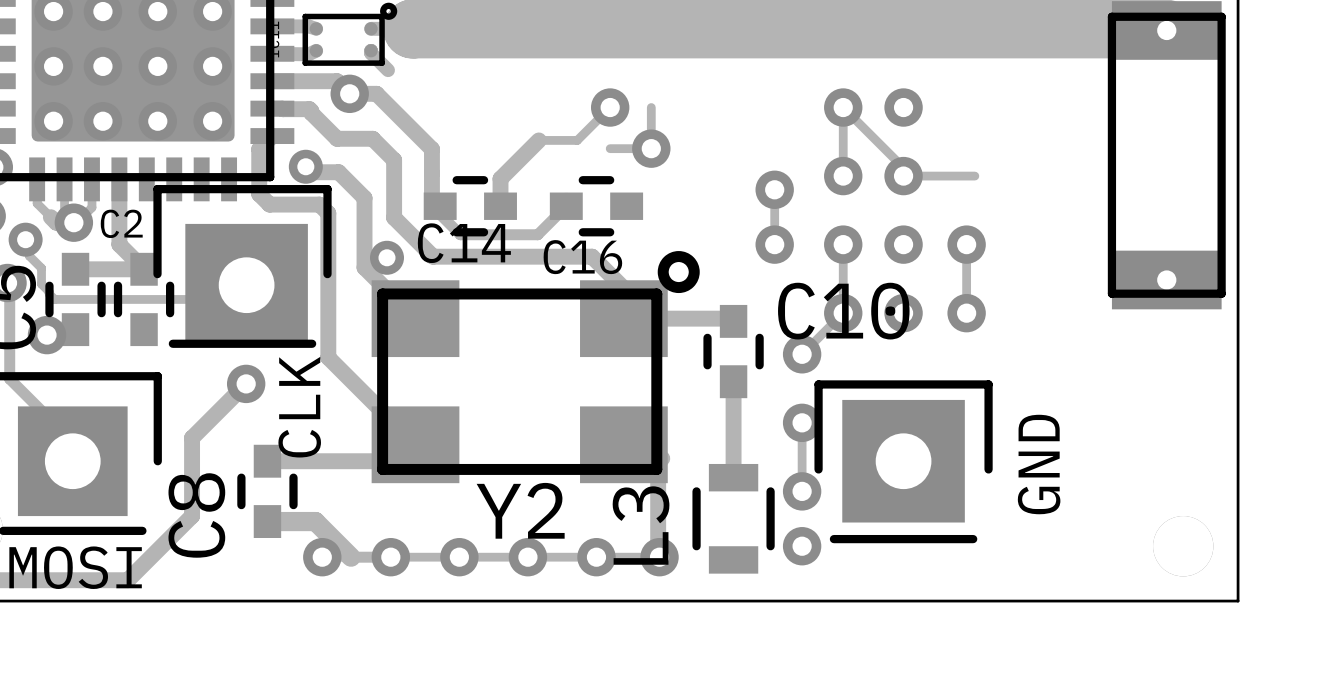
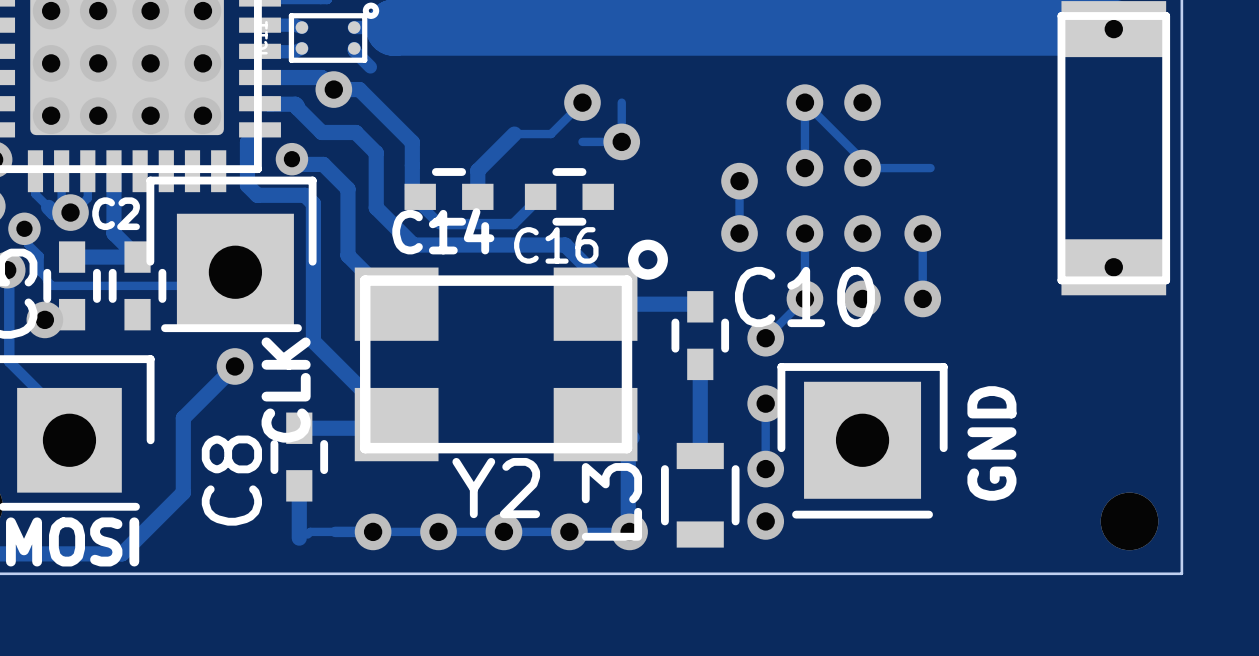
via: (386, 257) -> none
track: none -> (299, 428) (392, 428)
track: (267, 461) (399, 461) -> none
C8 position: (267, 491) -> (299, 457)
track: none -> (299, 485) (299, 538)
track: (267, 521) (315, 521) (351, 557) -> none
via: (322, 557) -> none

